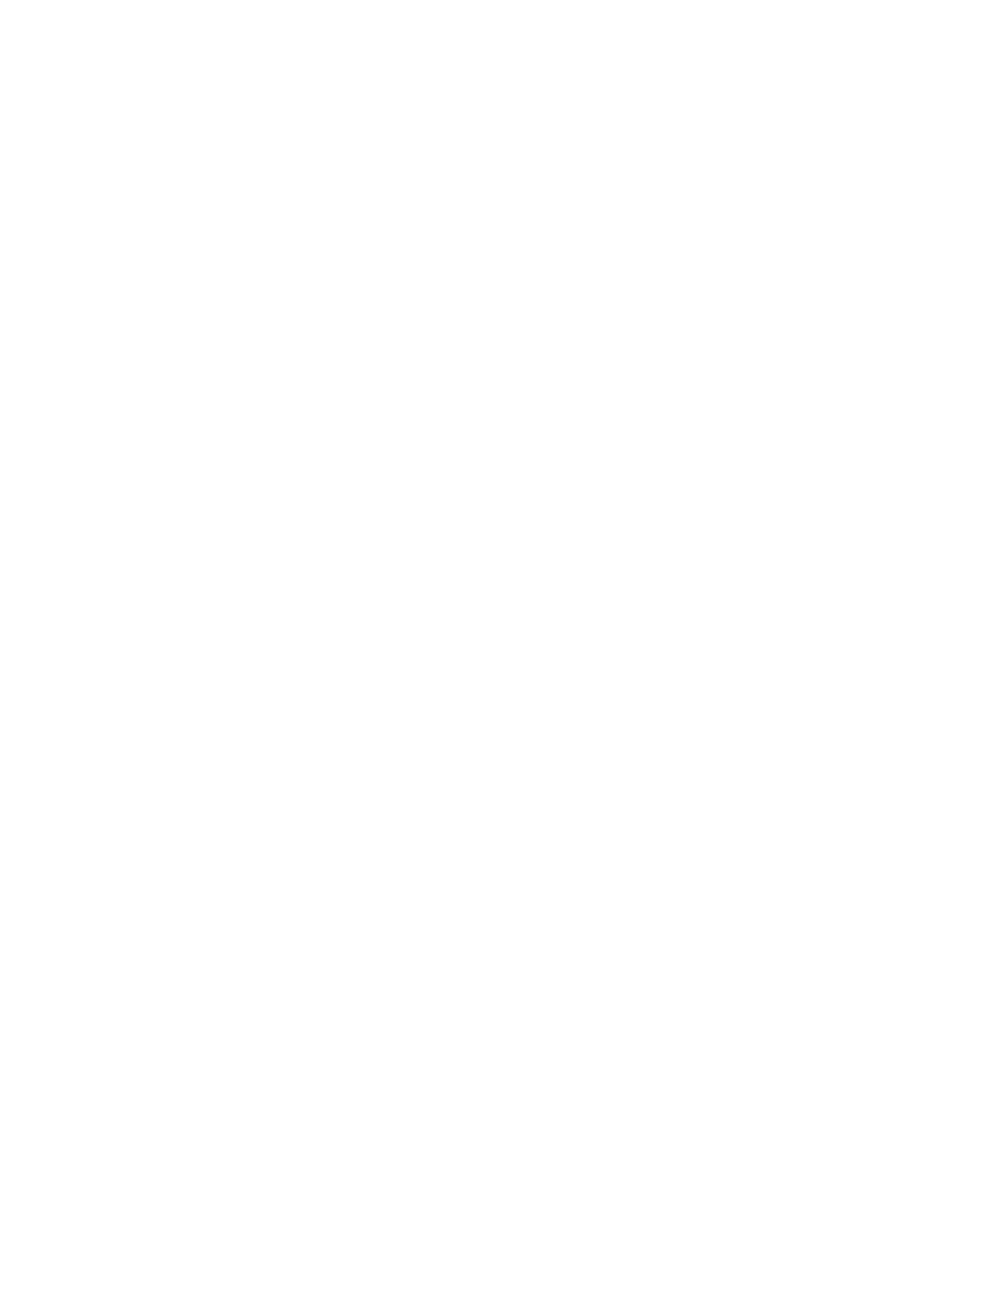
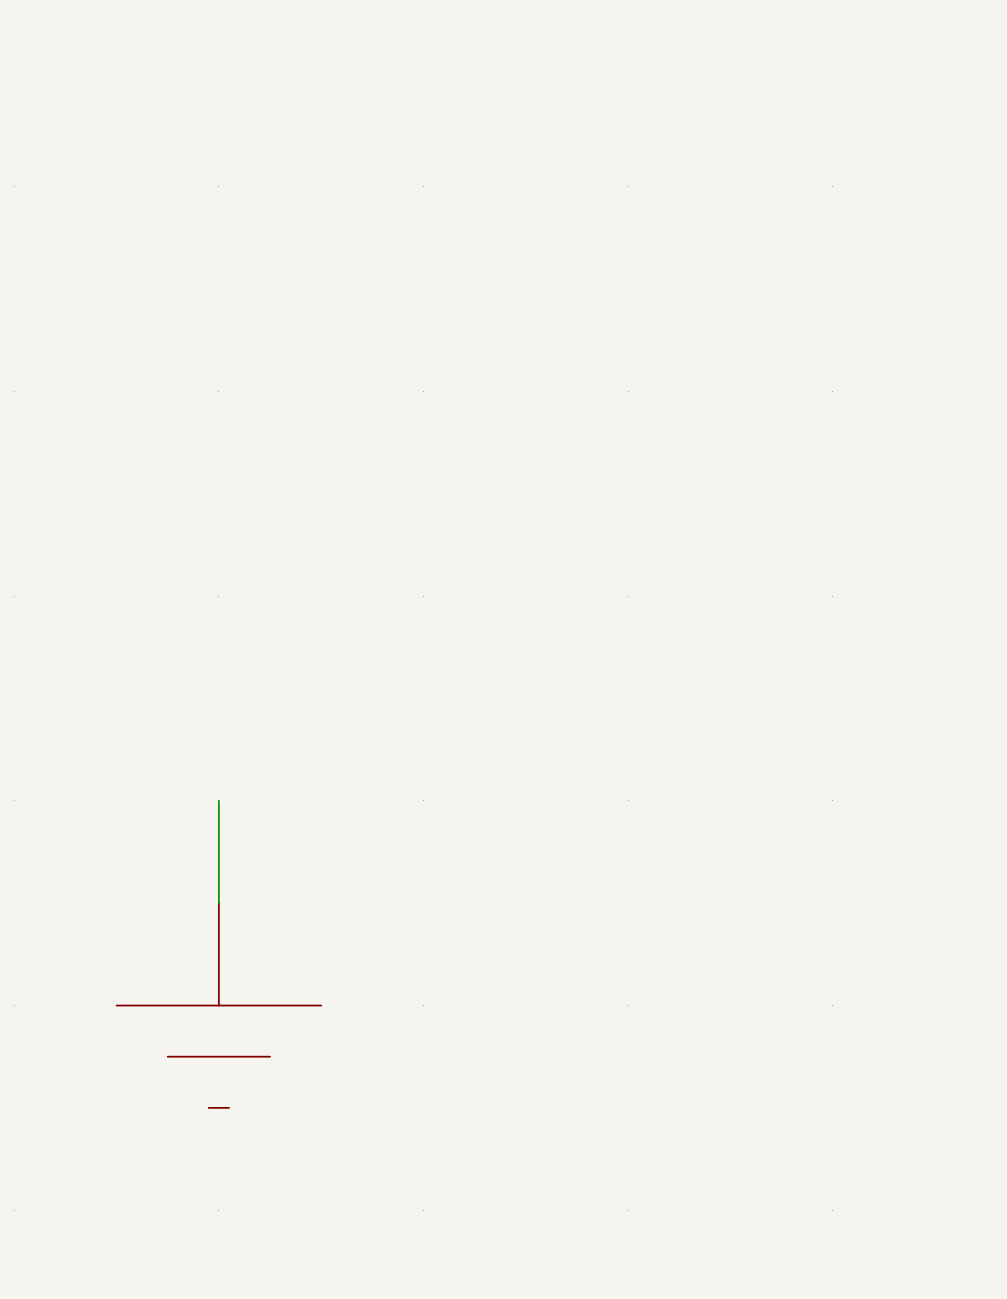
wire: none -> (218, 800) (218, 903)
power symbol: none -> (218, 1005)

